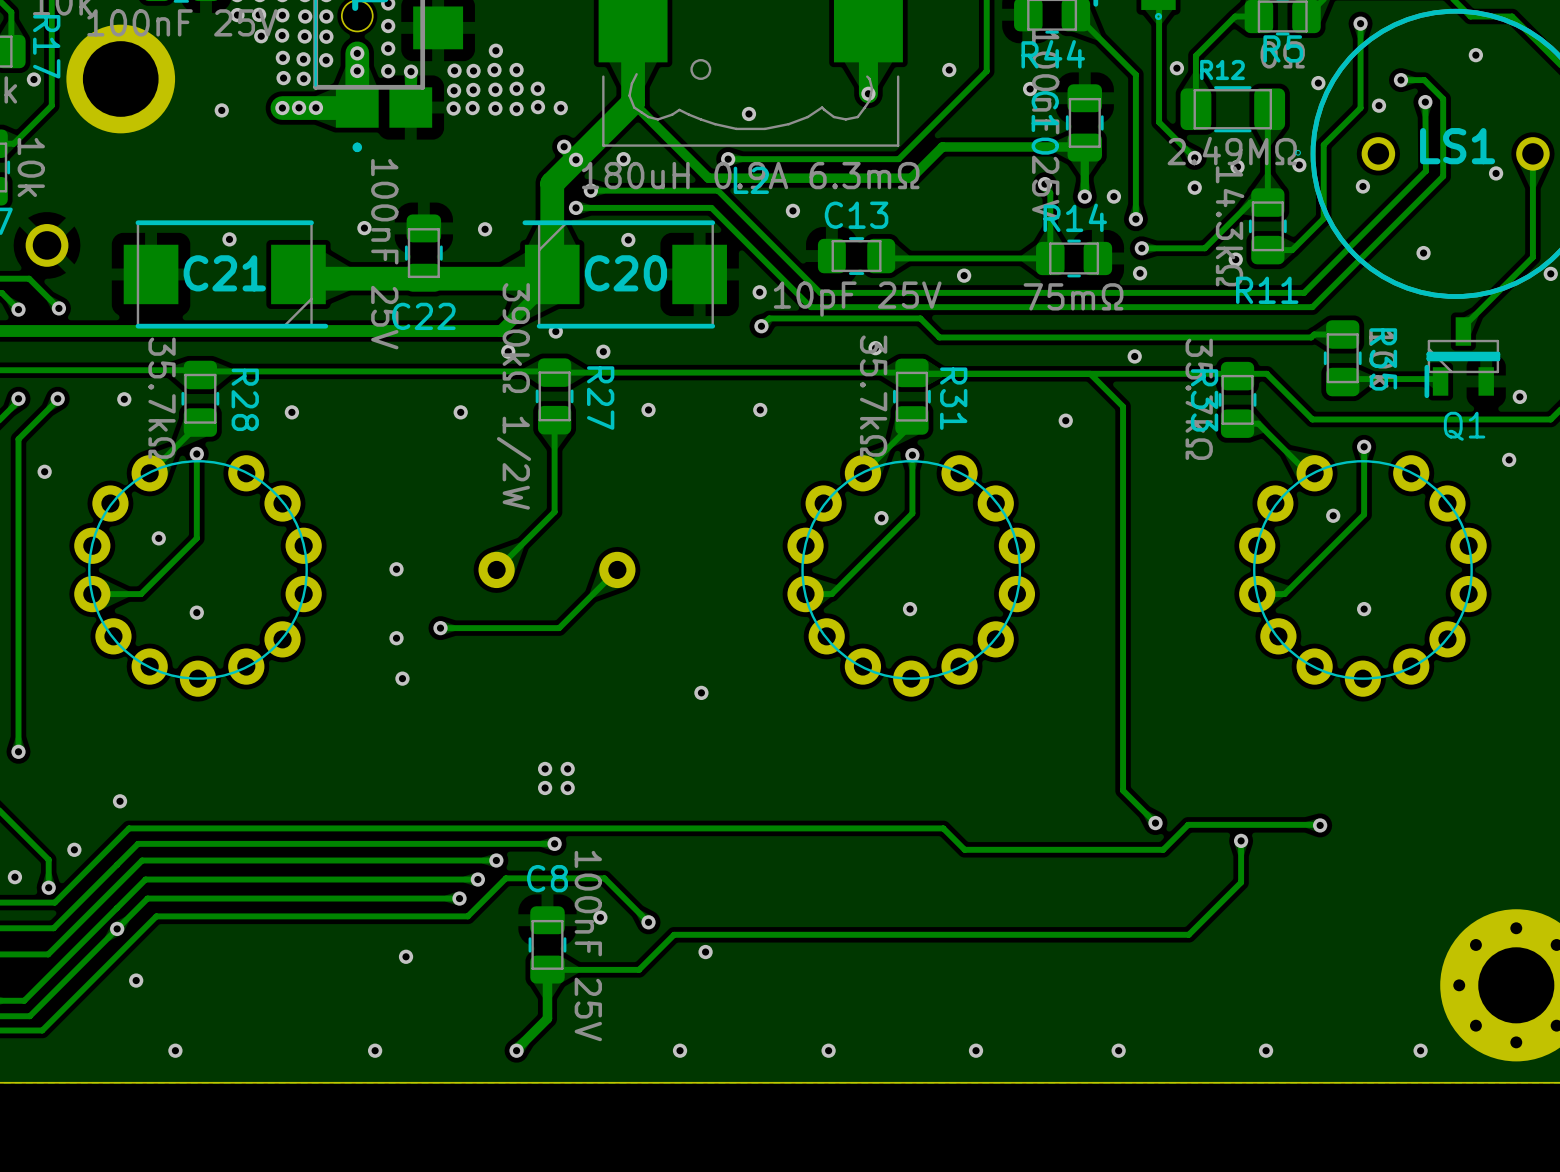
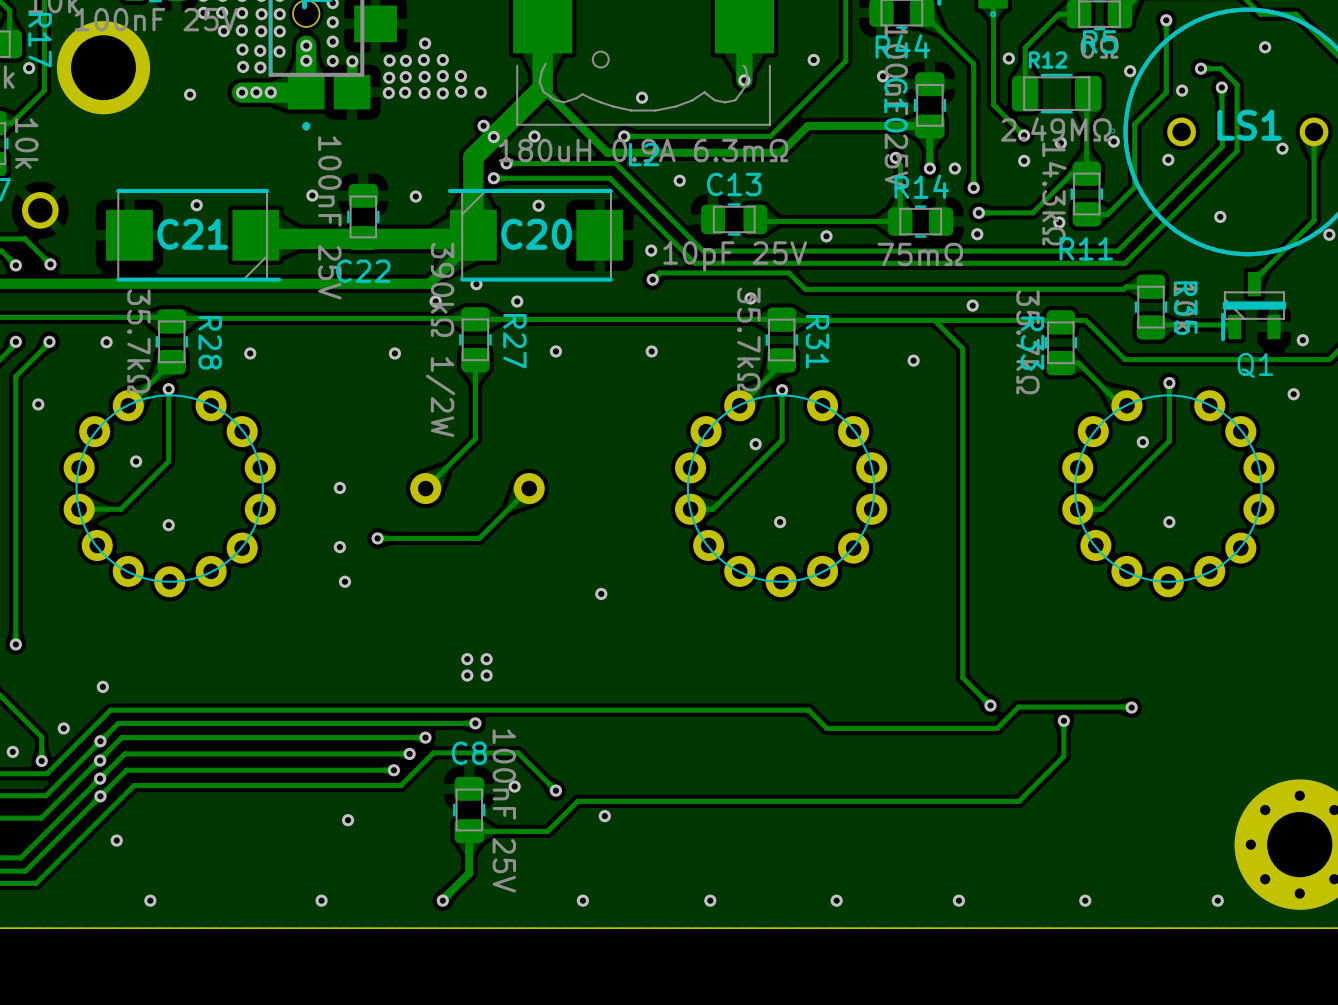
via: none -> (100, 741)
via: none -> (100, 760)
via: none -> (100, 778)

